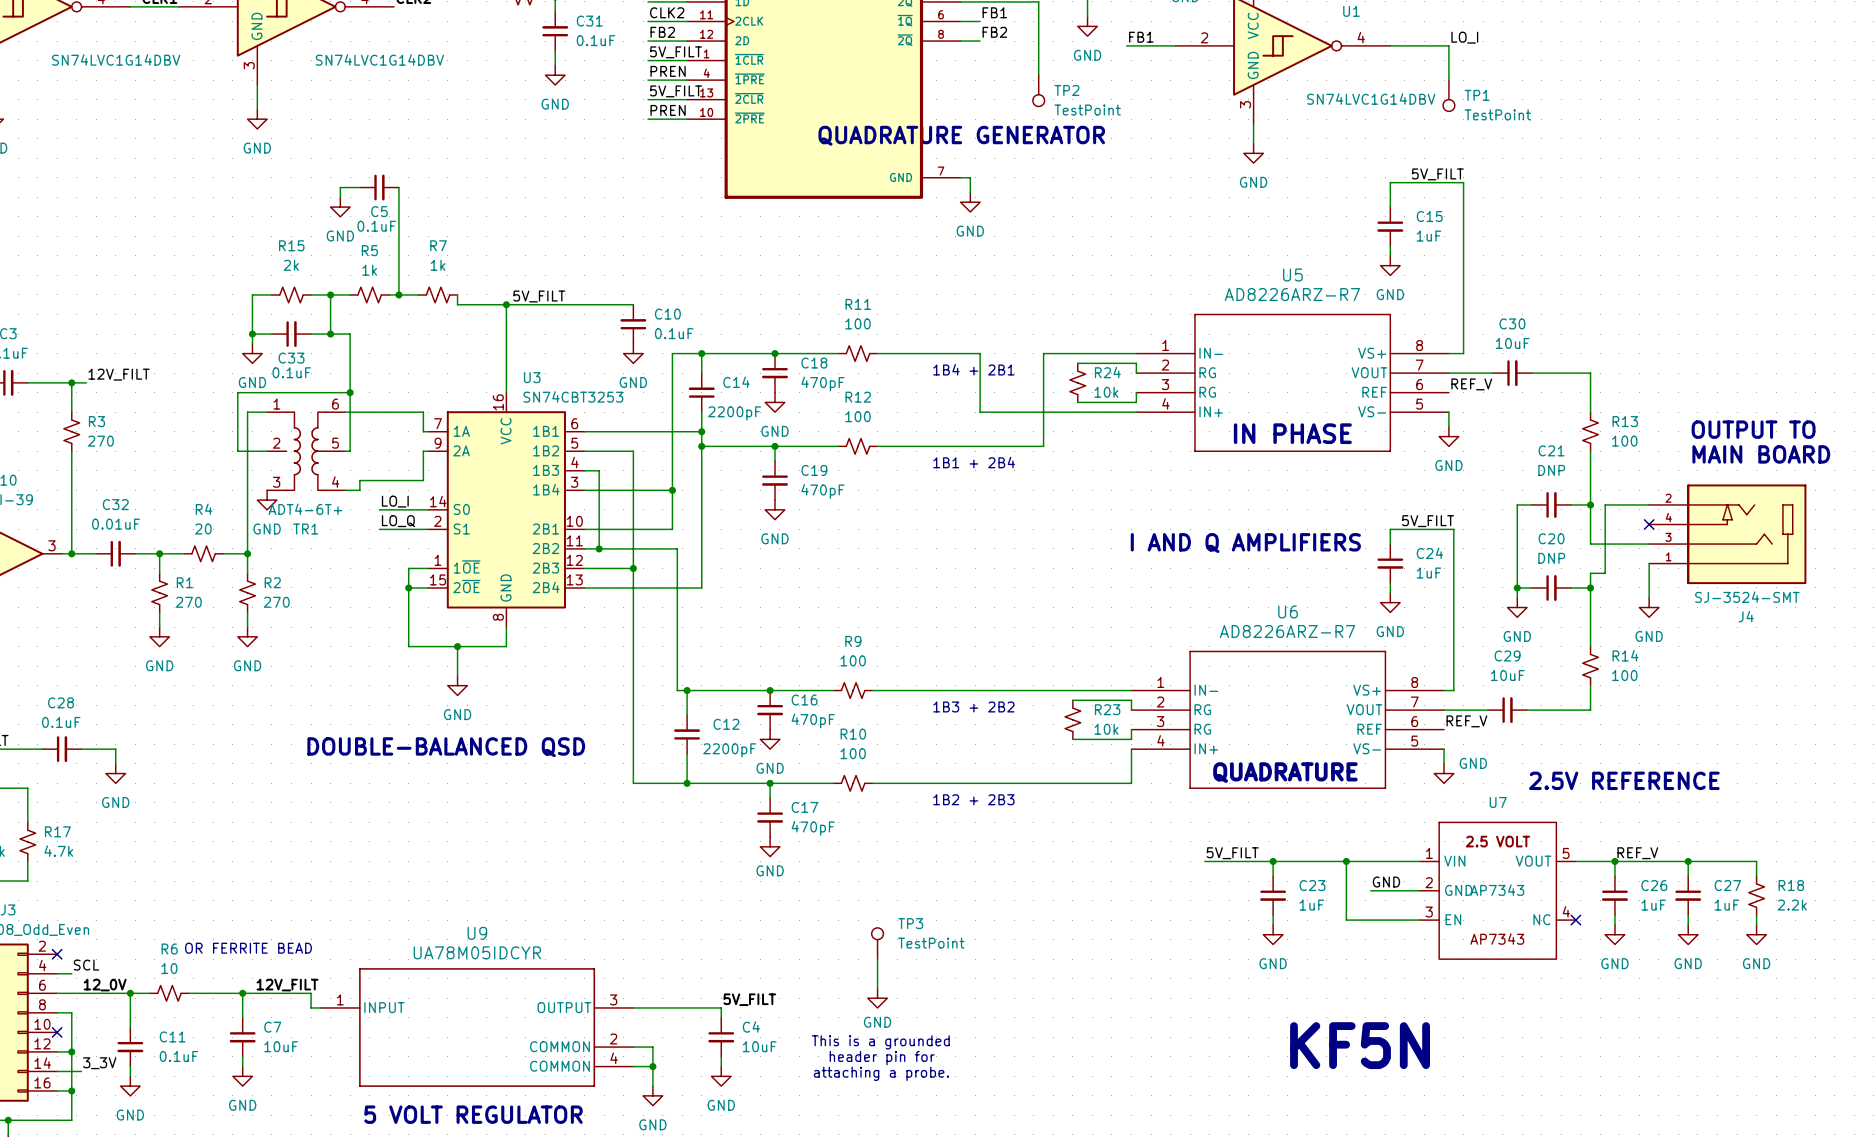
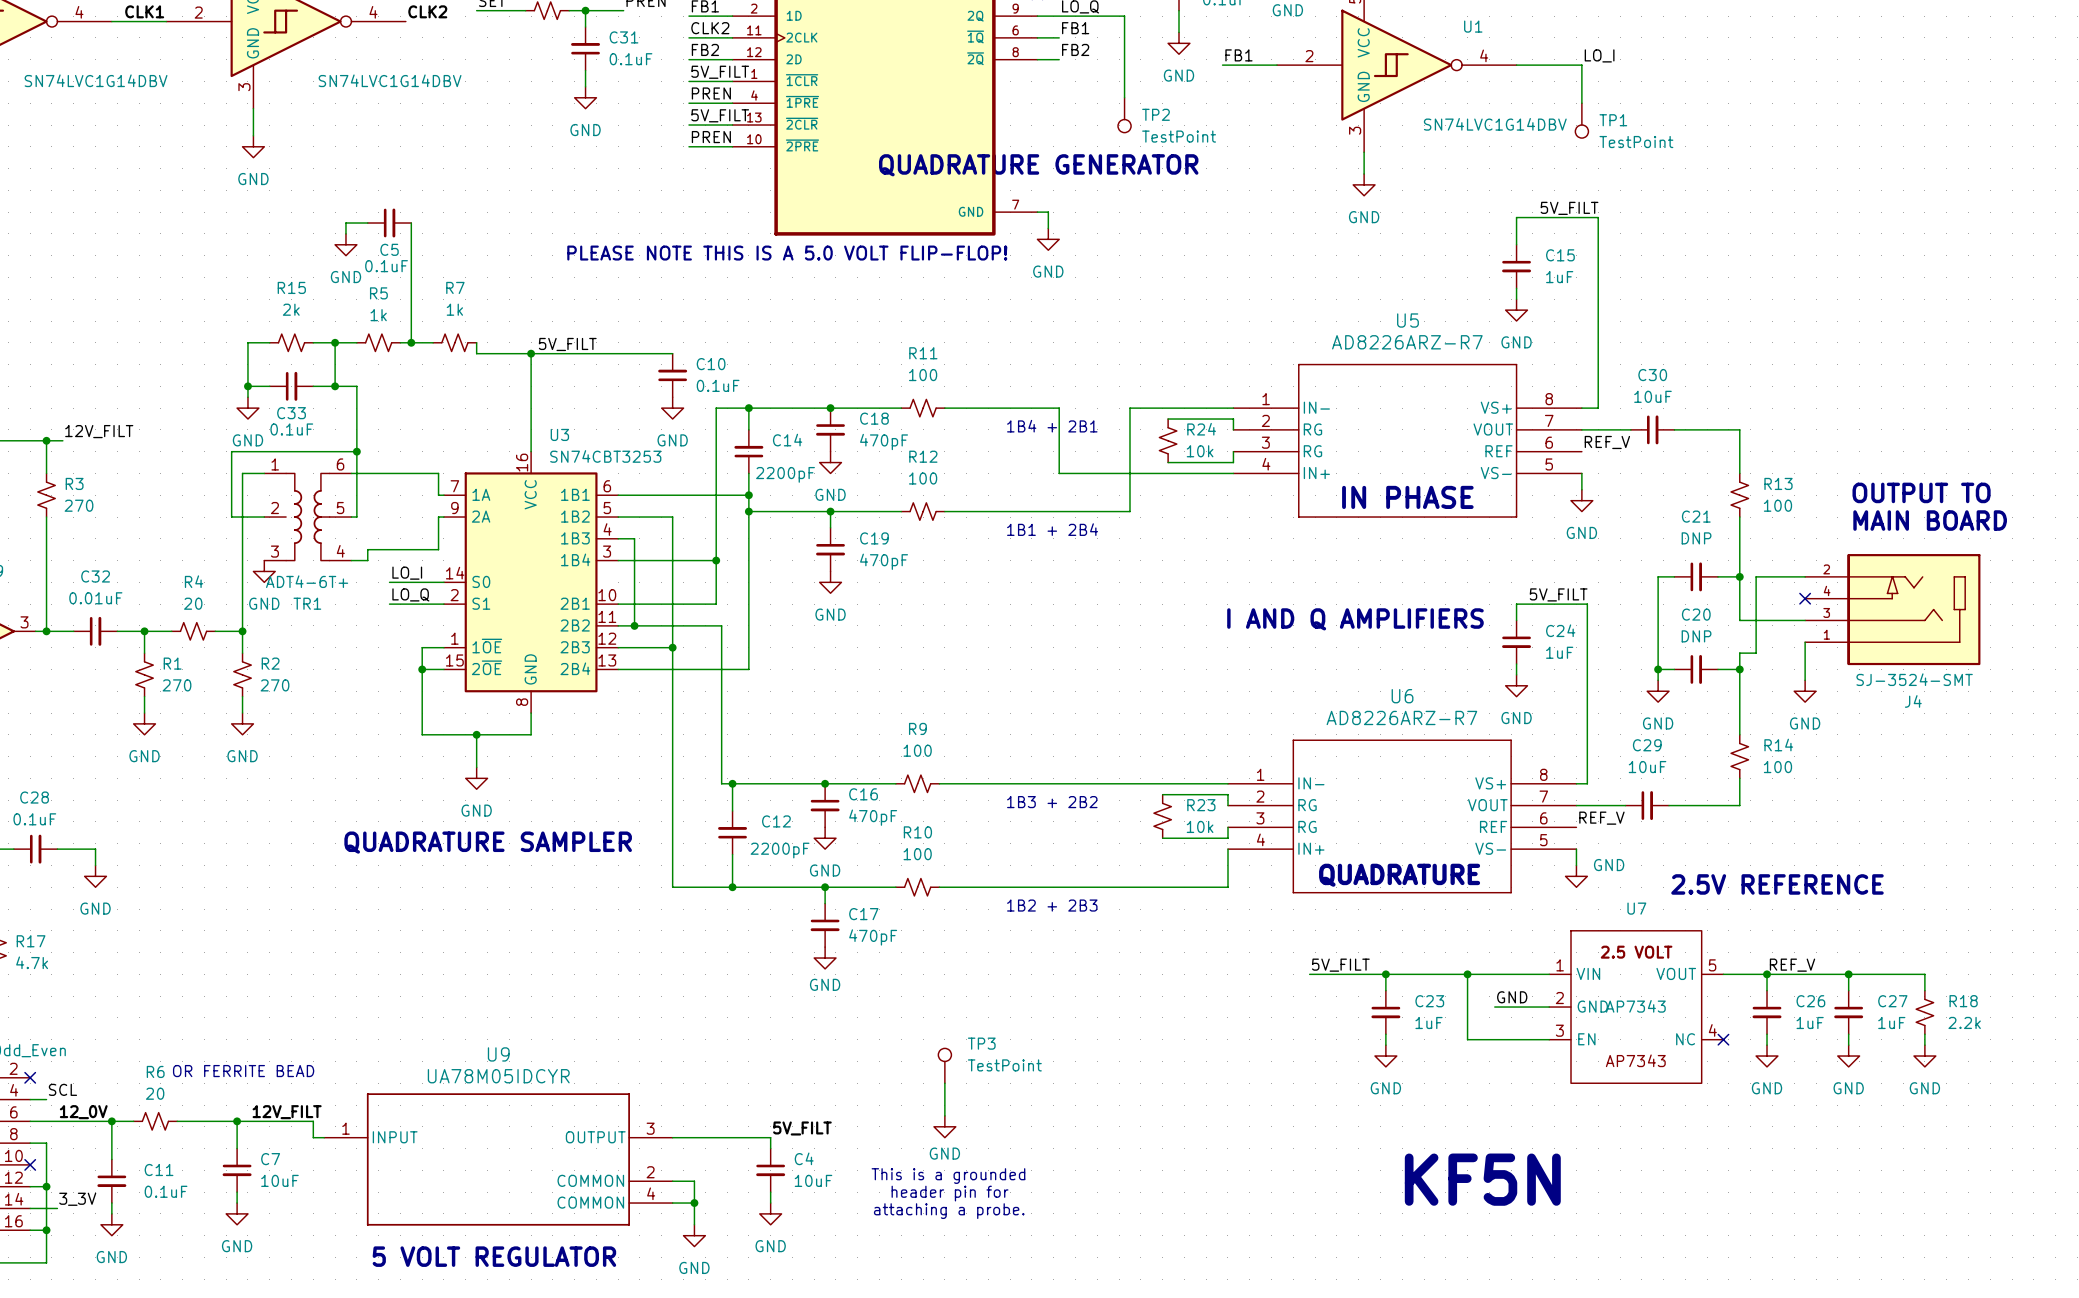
text: none -> PLEASE NOTE THIS IS A 5.0 VOLT FLIP-FLOP! (787, 253)
text: none -> QUADRATURE SAMPLER (488, 842)
text: DOUBLE-BALANCED QSD (446, 747) -> none
R6 value: 10 (169, 968) -> 20 (155, 1093)

